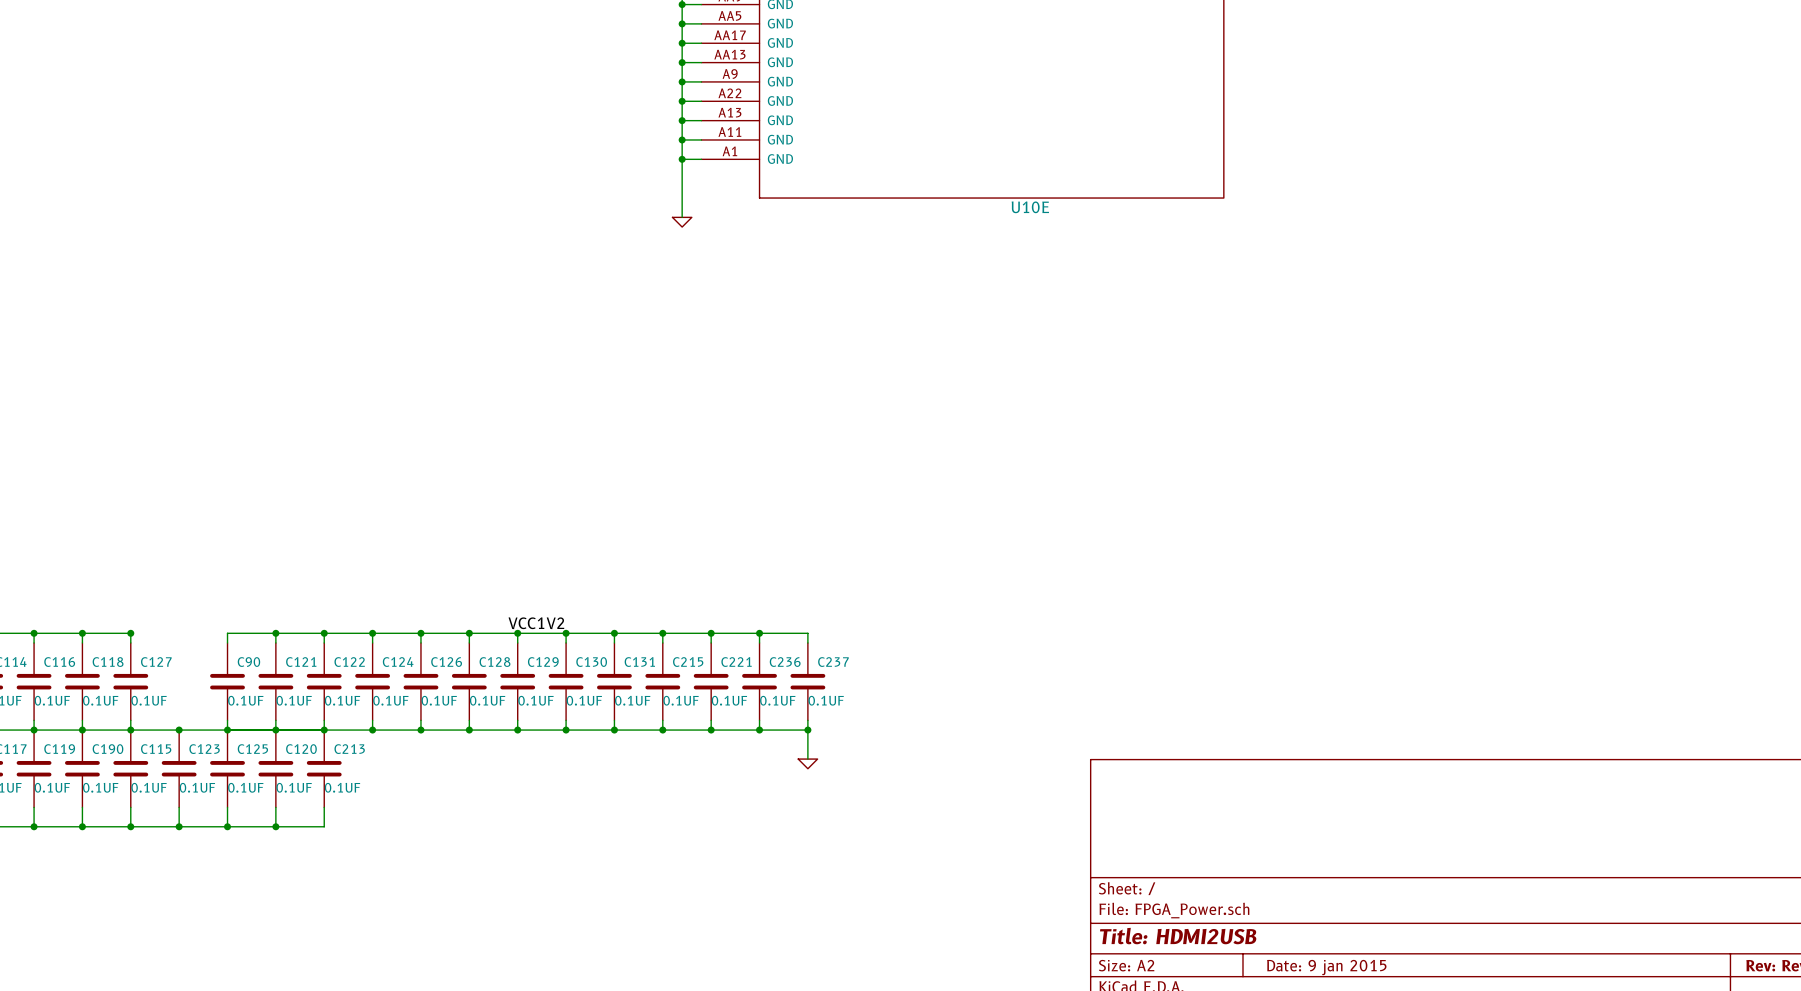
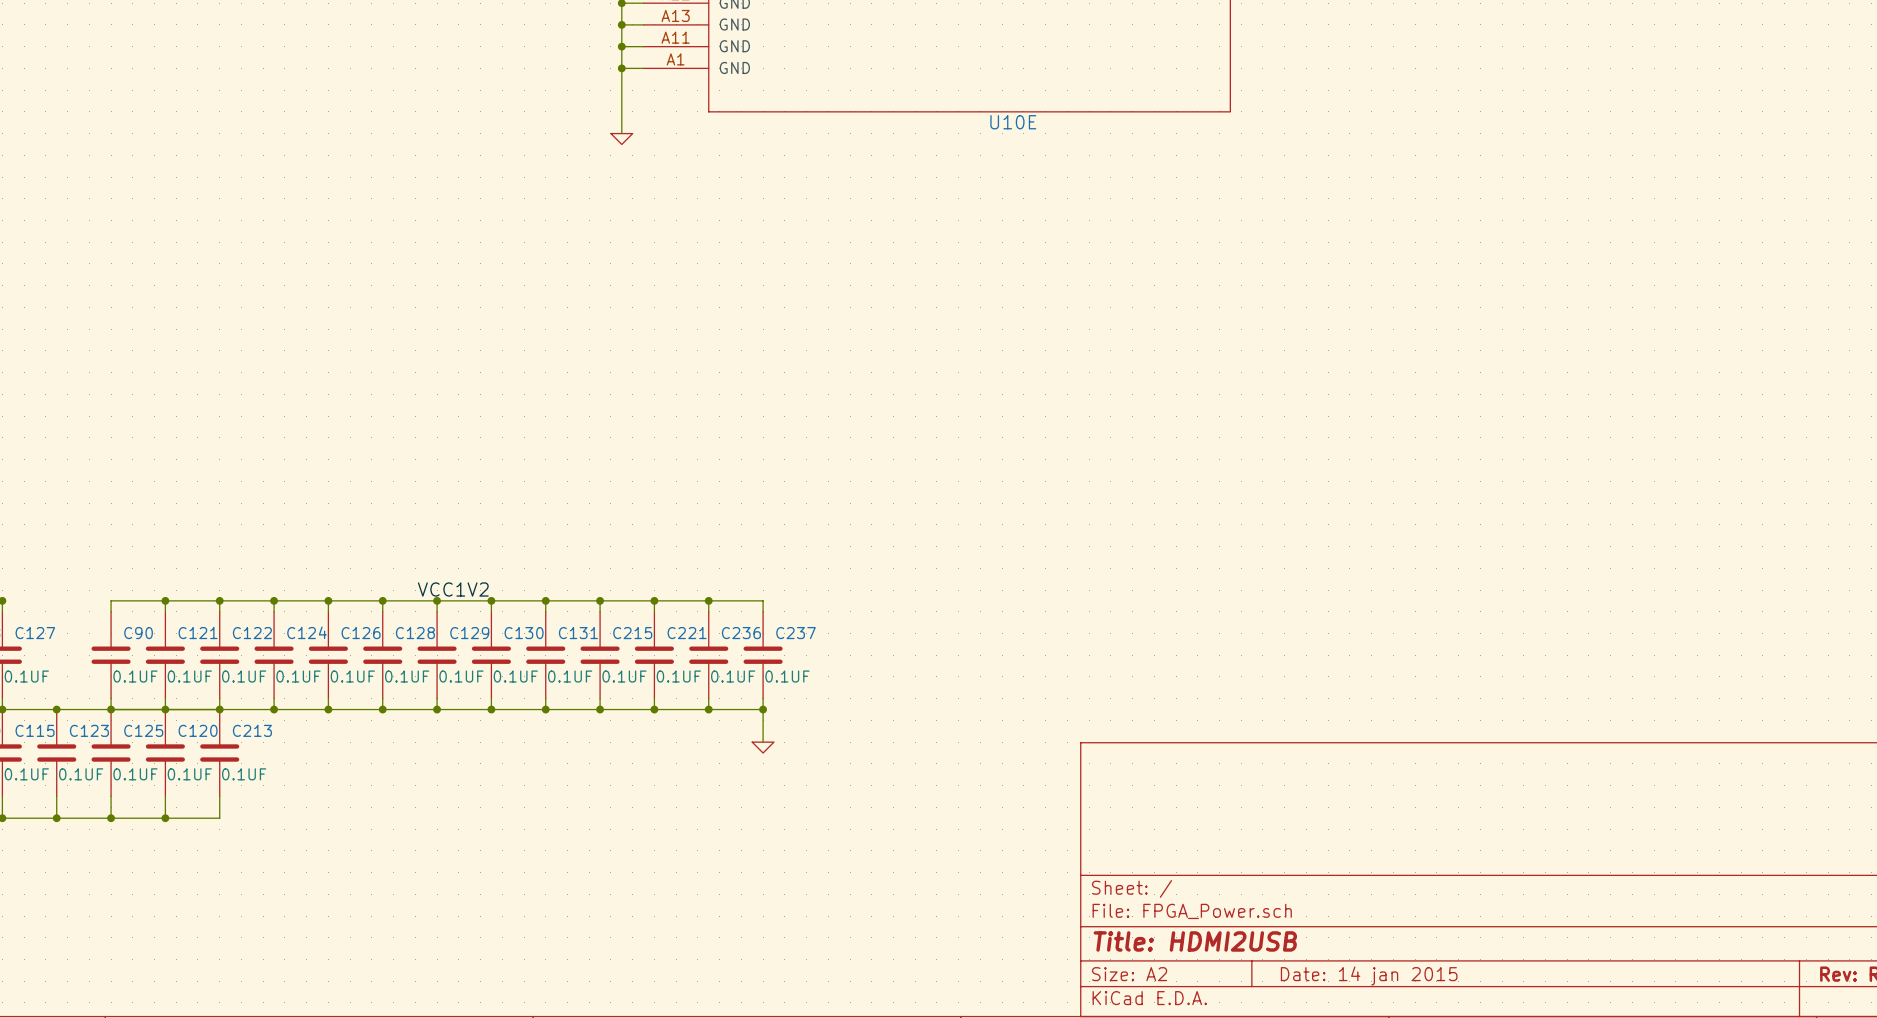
title block: Date: 9 jan 2015 (1326, 967) -> Date: 14 jan 2015 (1369, 975)

